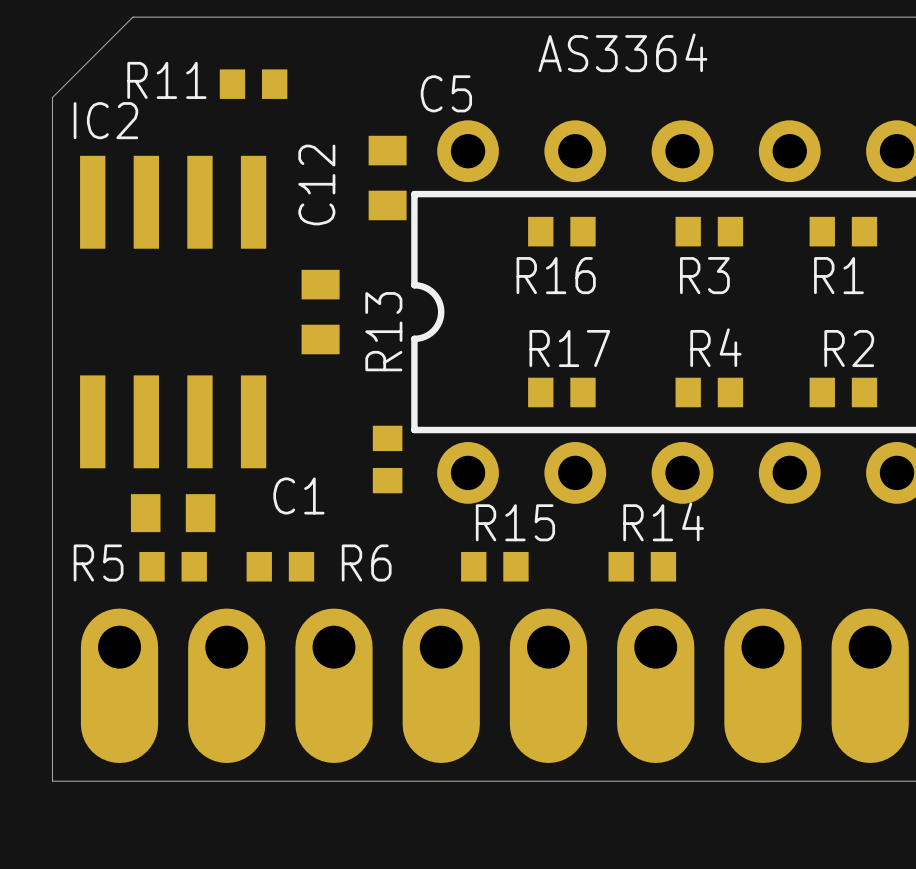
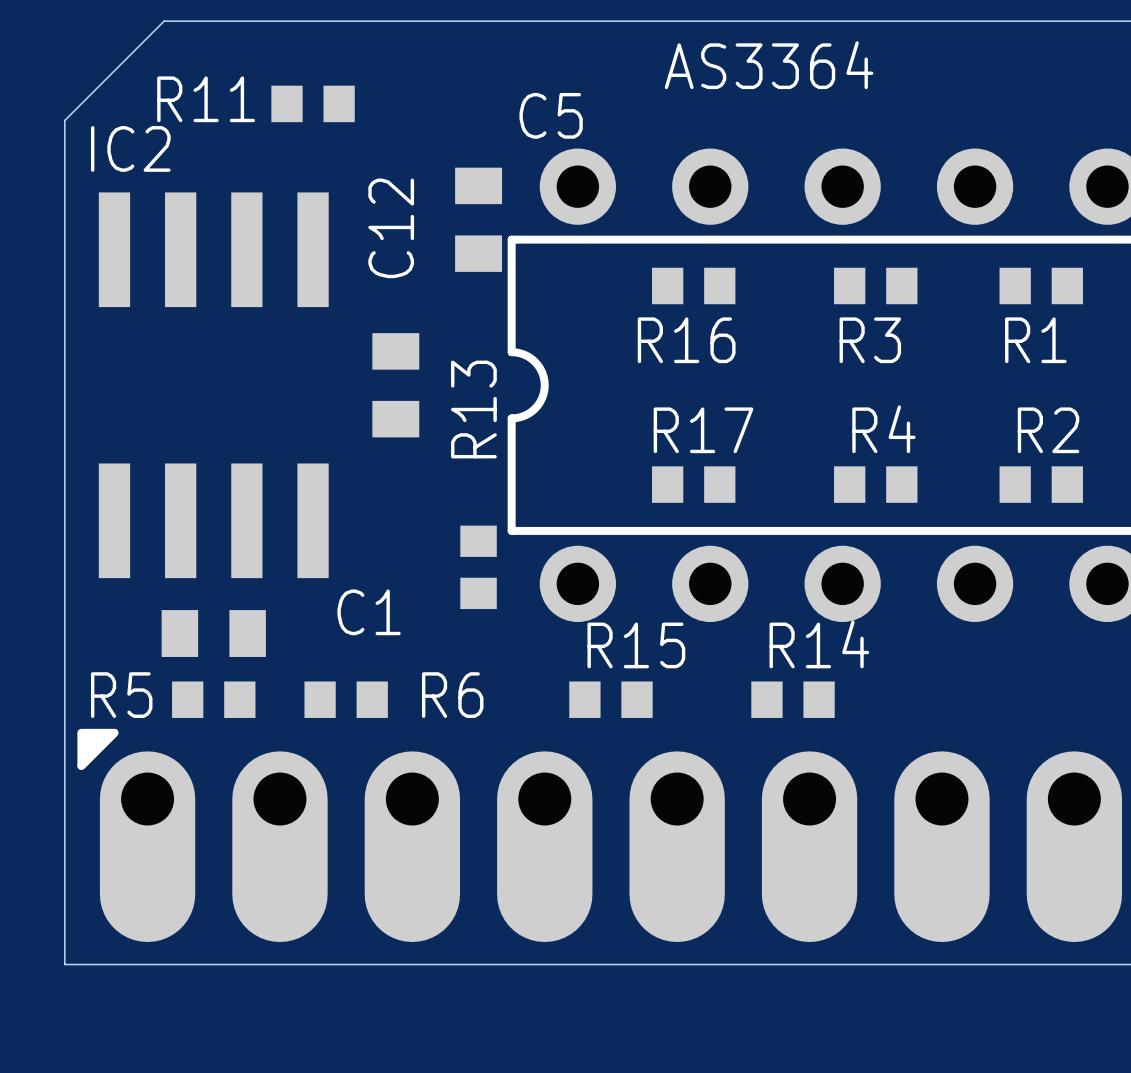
part: none -> (599, 835)

